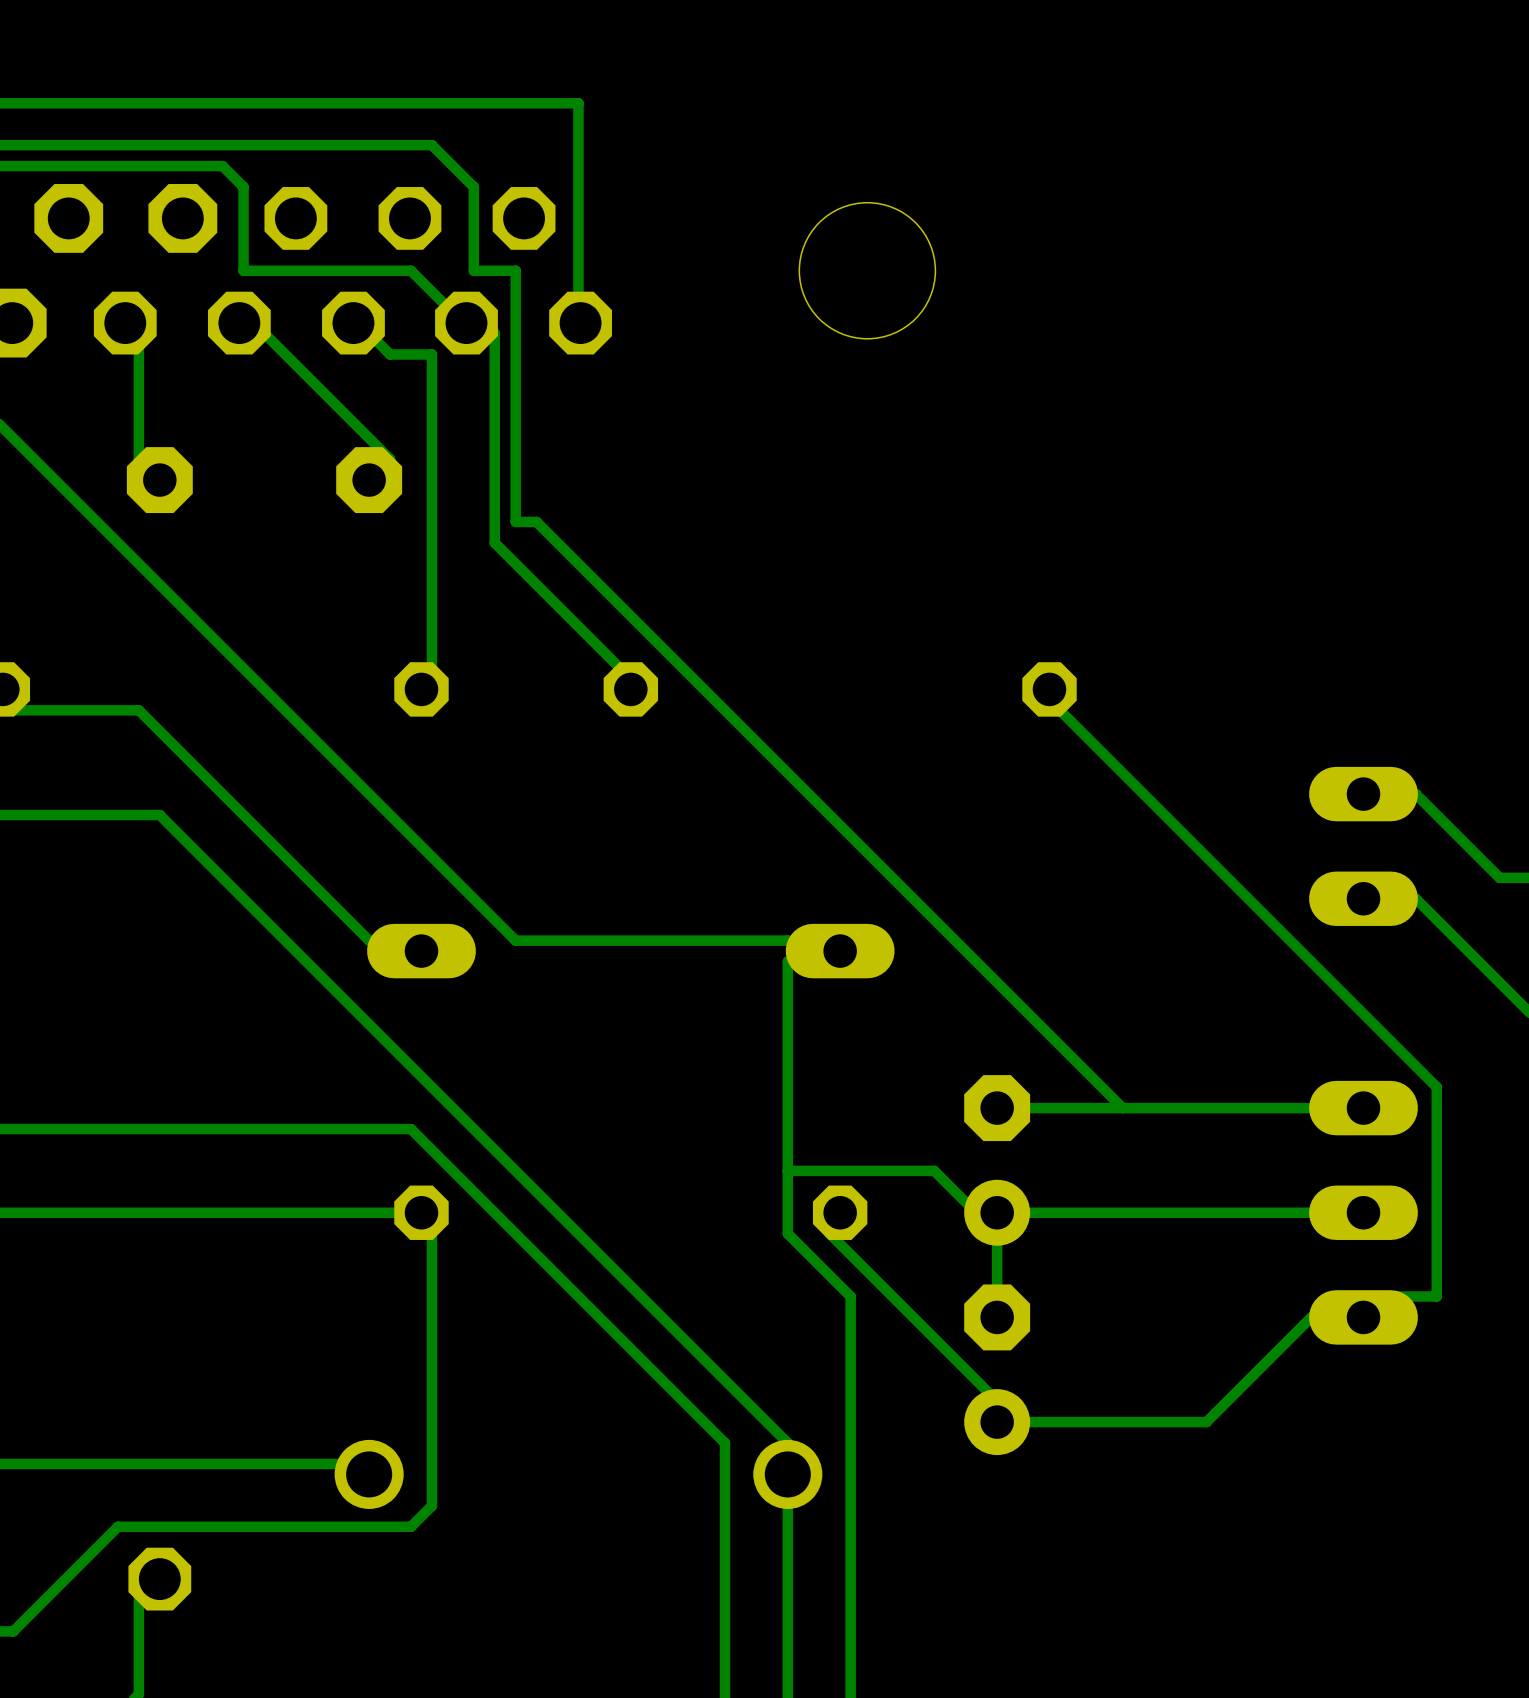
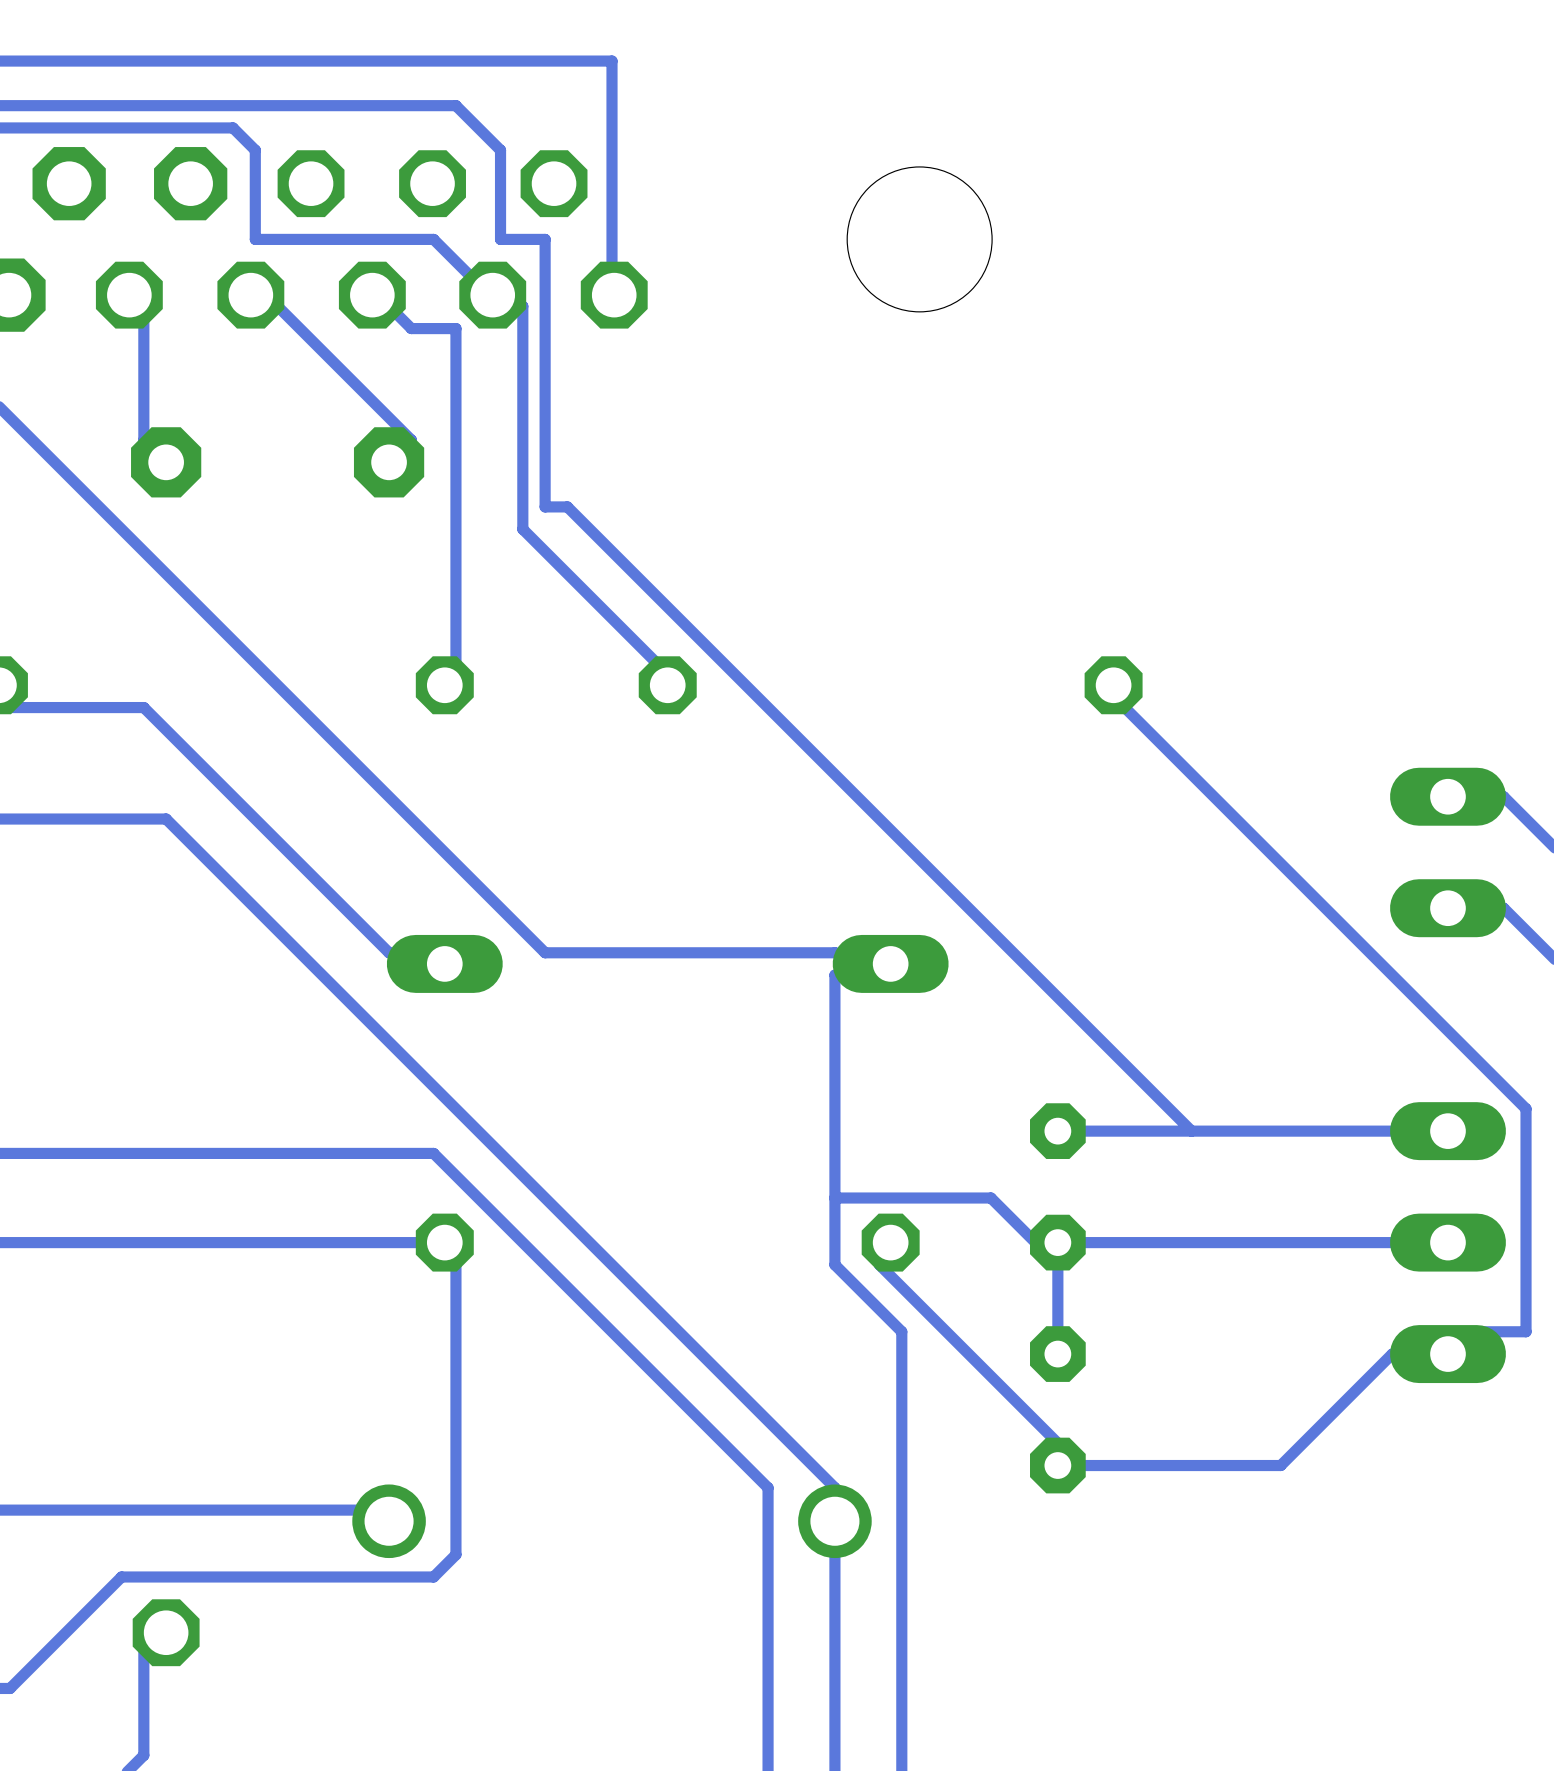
part footprint: [964, 1075, 1031, 1246] -> [1029, 1103, 1086, 1271]
part footprint: [964, 1284, 1031, 1456] -> [1029, 1326, 1086, 1494]

